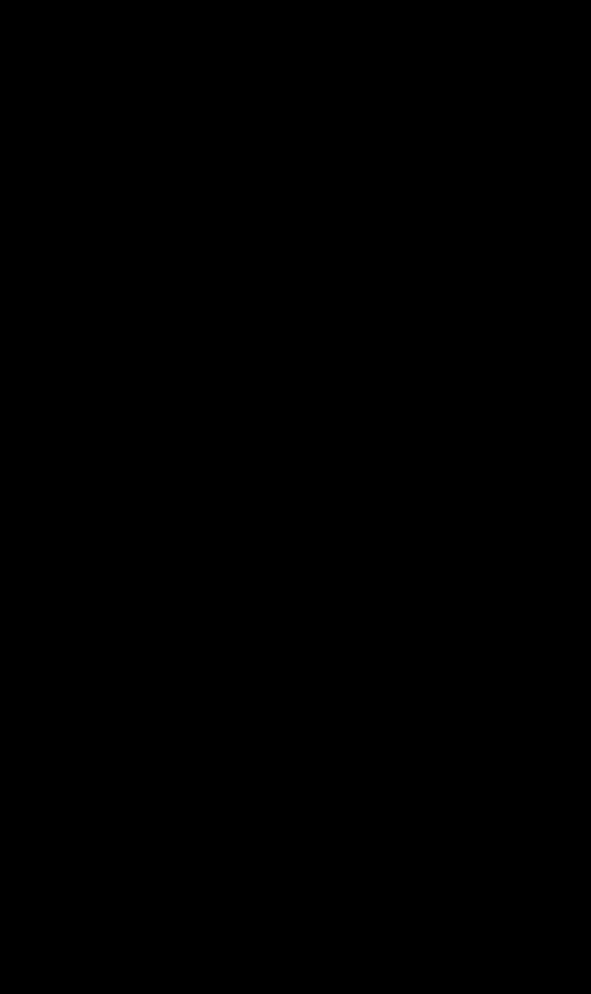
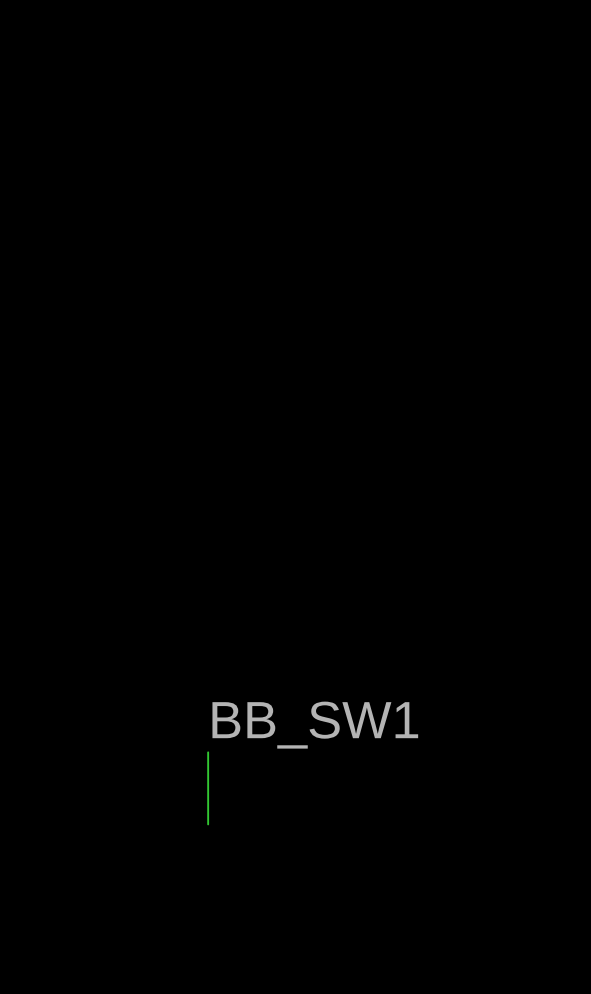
label: none -> BB_SW1 (315, 725)
wire: none -> (208, 752) (208, 824)

